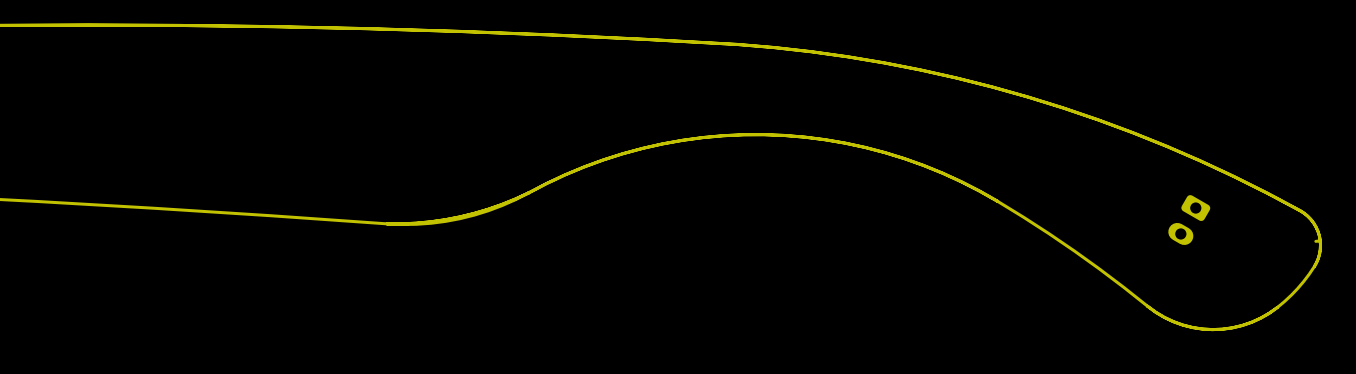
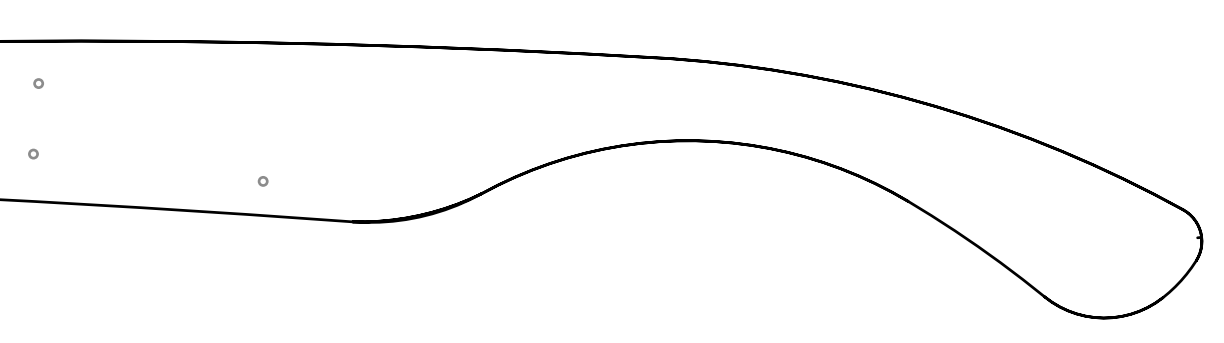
via: none -> (38, 83)
via: none -> (33, 154)
via: none -> (263, 181)
part: (1189, 220) -> none

